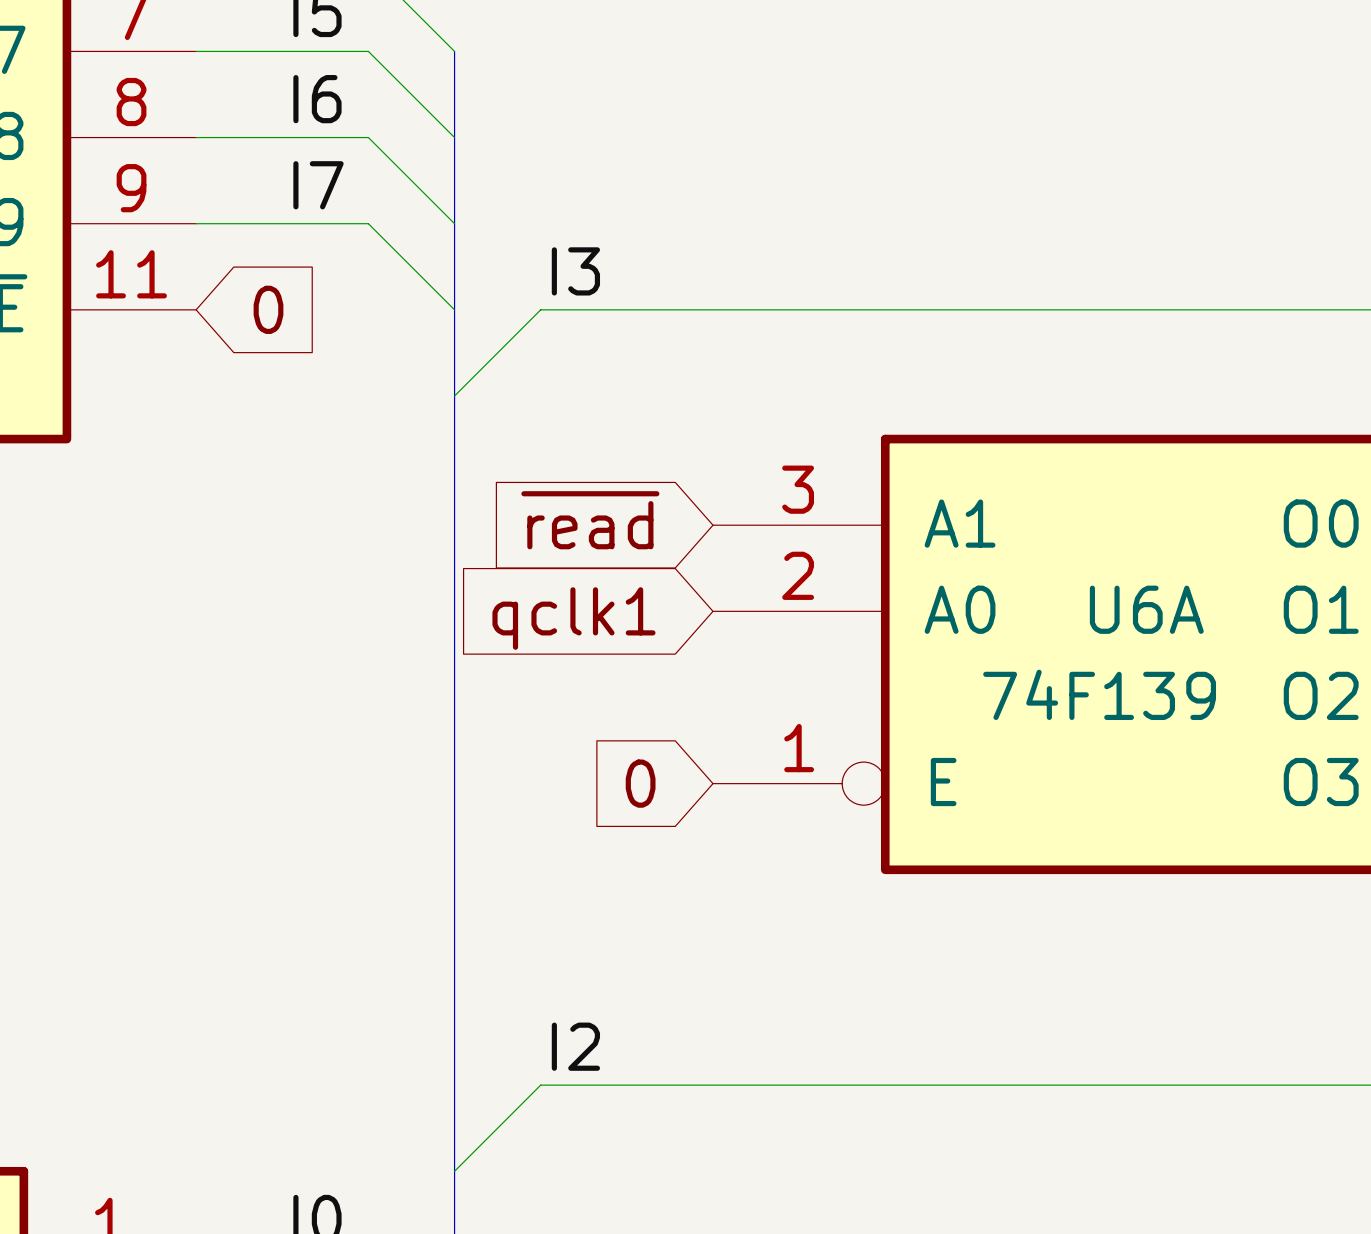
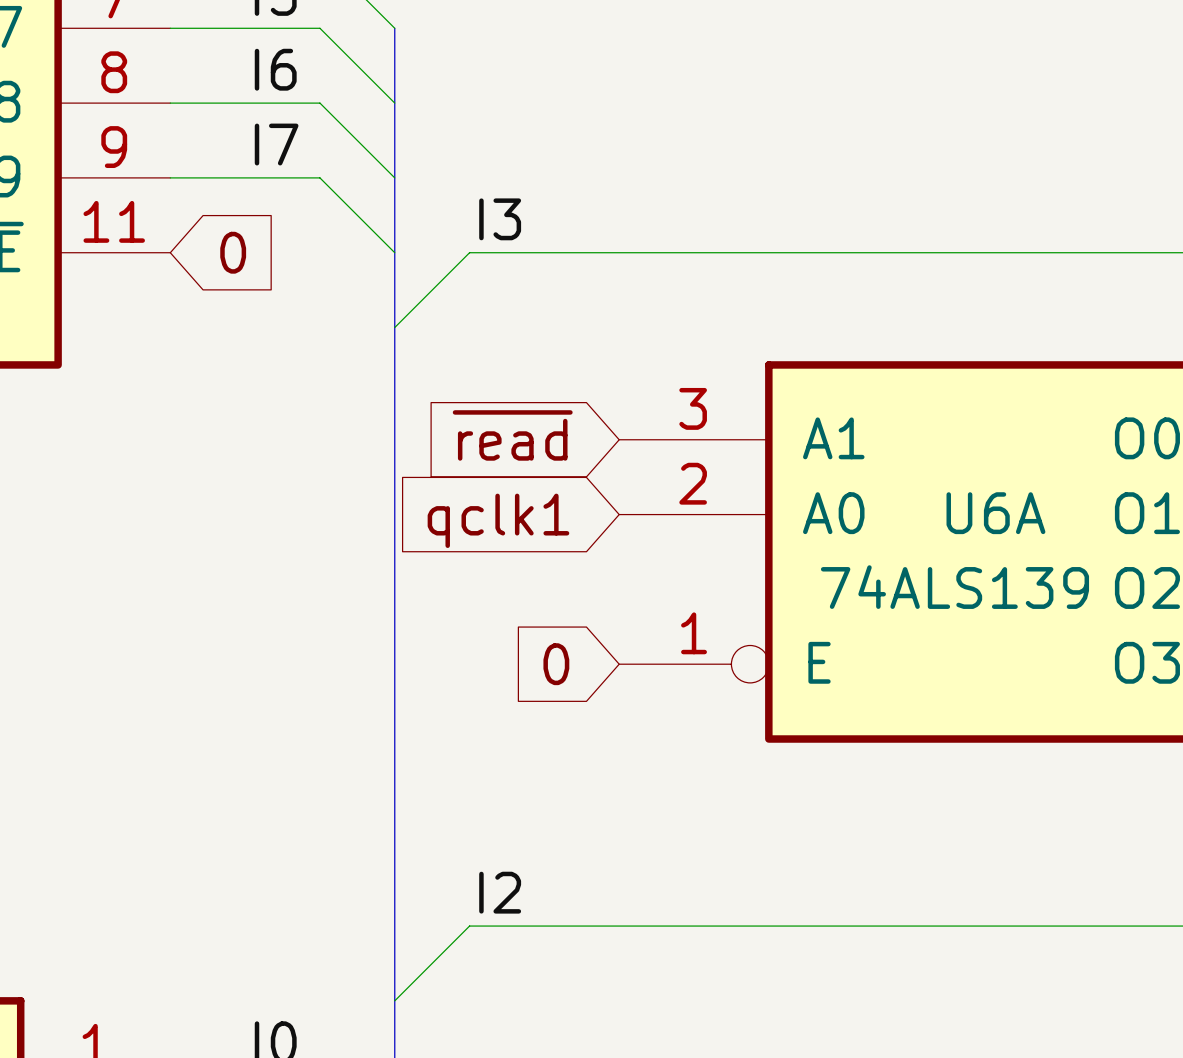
U6A value: 74F139 (1099, 694) -> 74ALS139 (954, 587)

